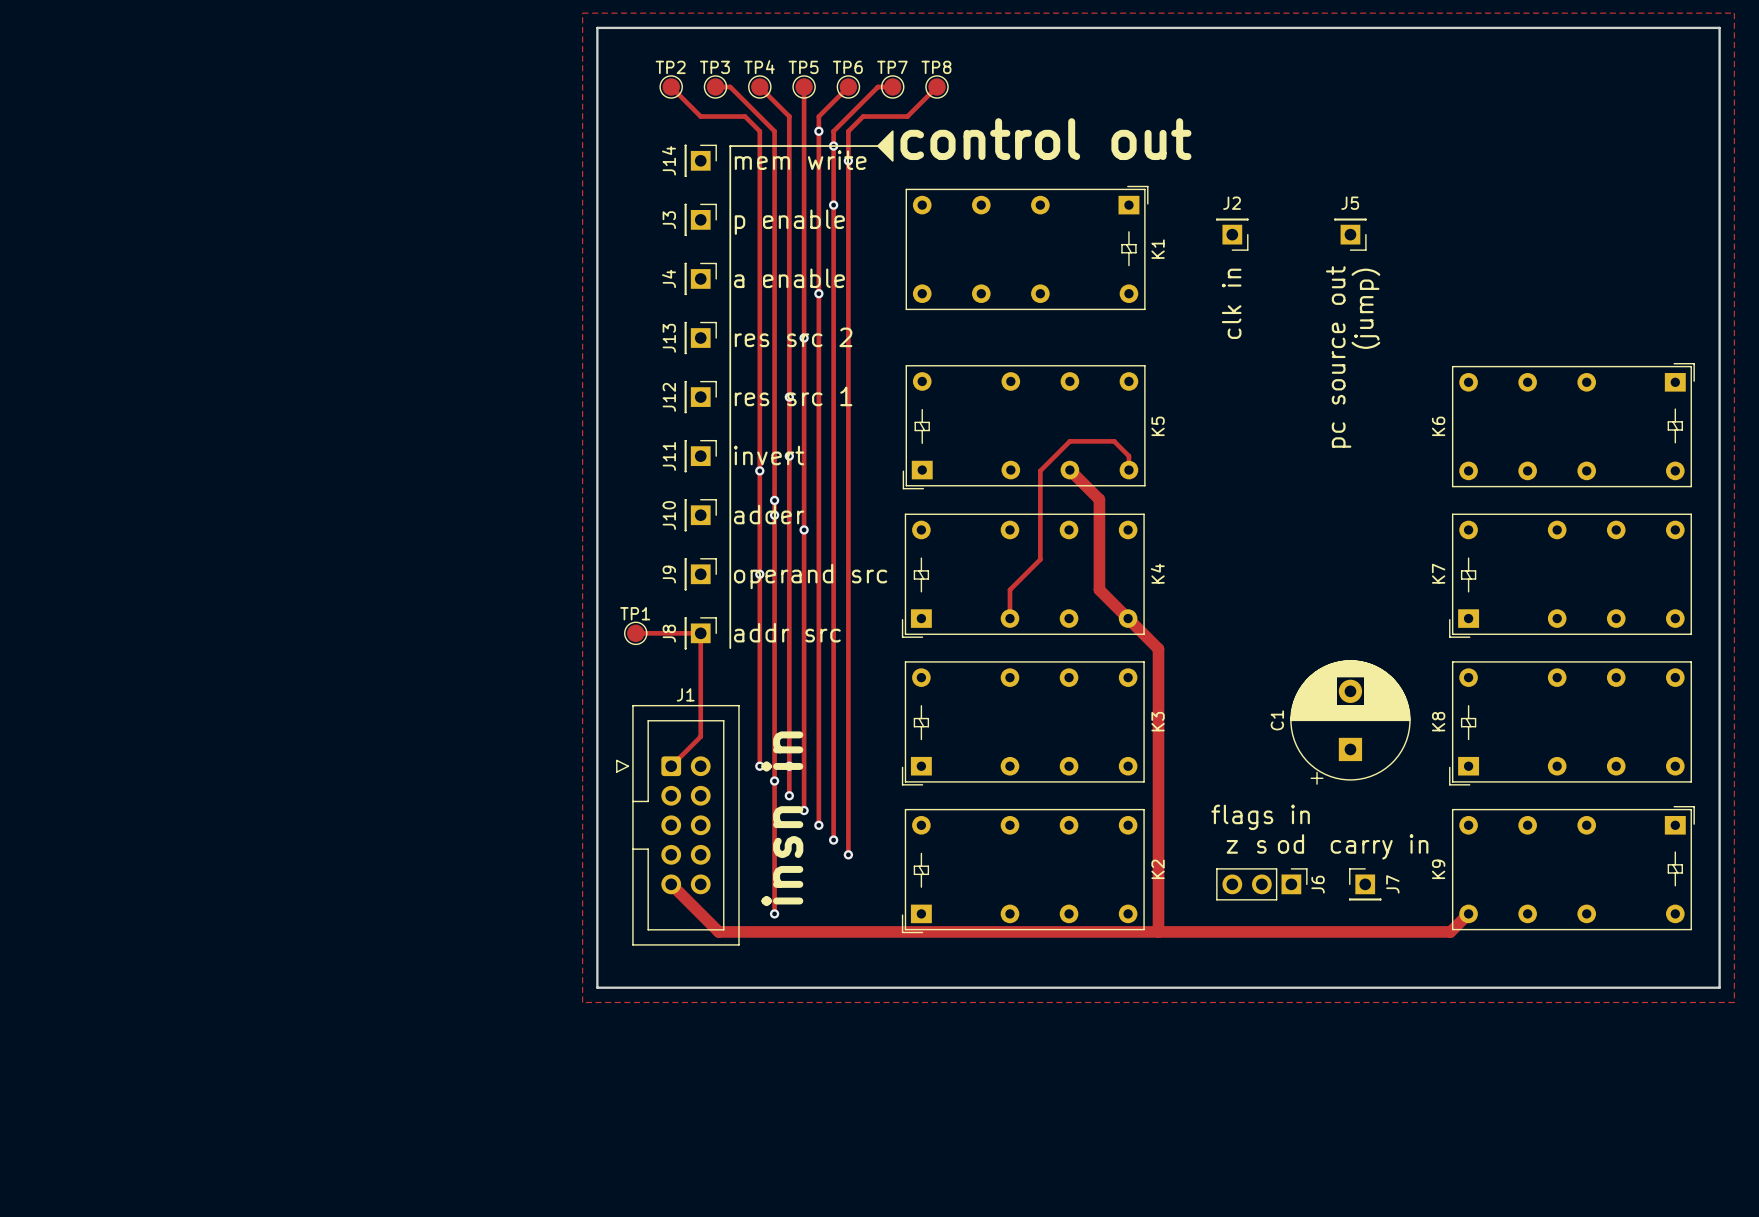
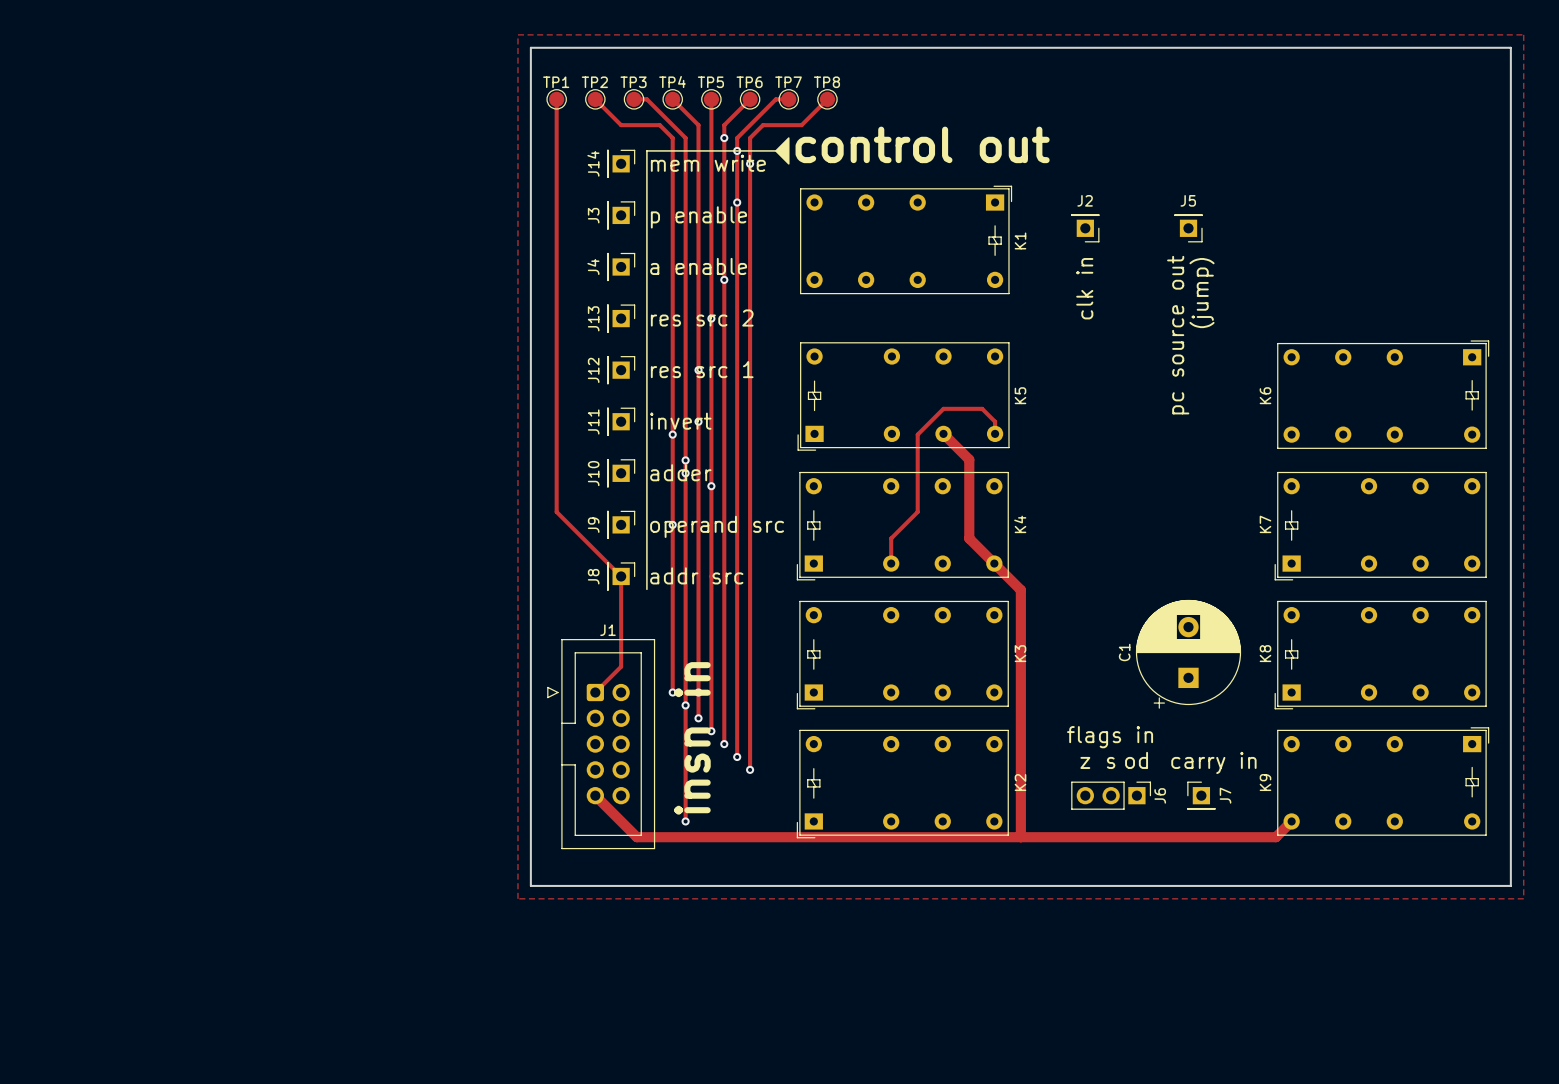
track: (635, 633) (700, 633) -> (556, 99) (556, 511) (621, 576)
TP1 position: (635, 633) -> (556, 99)

